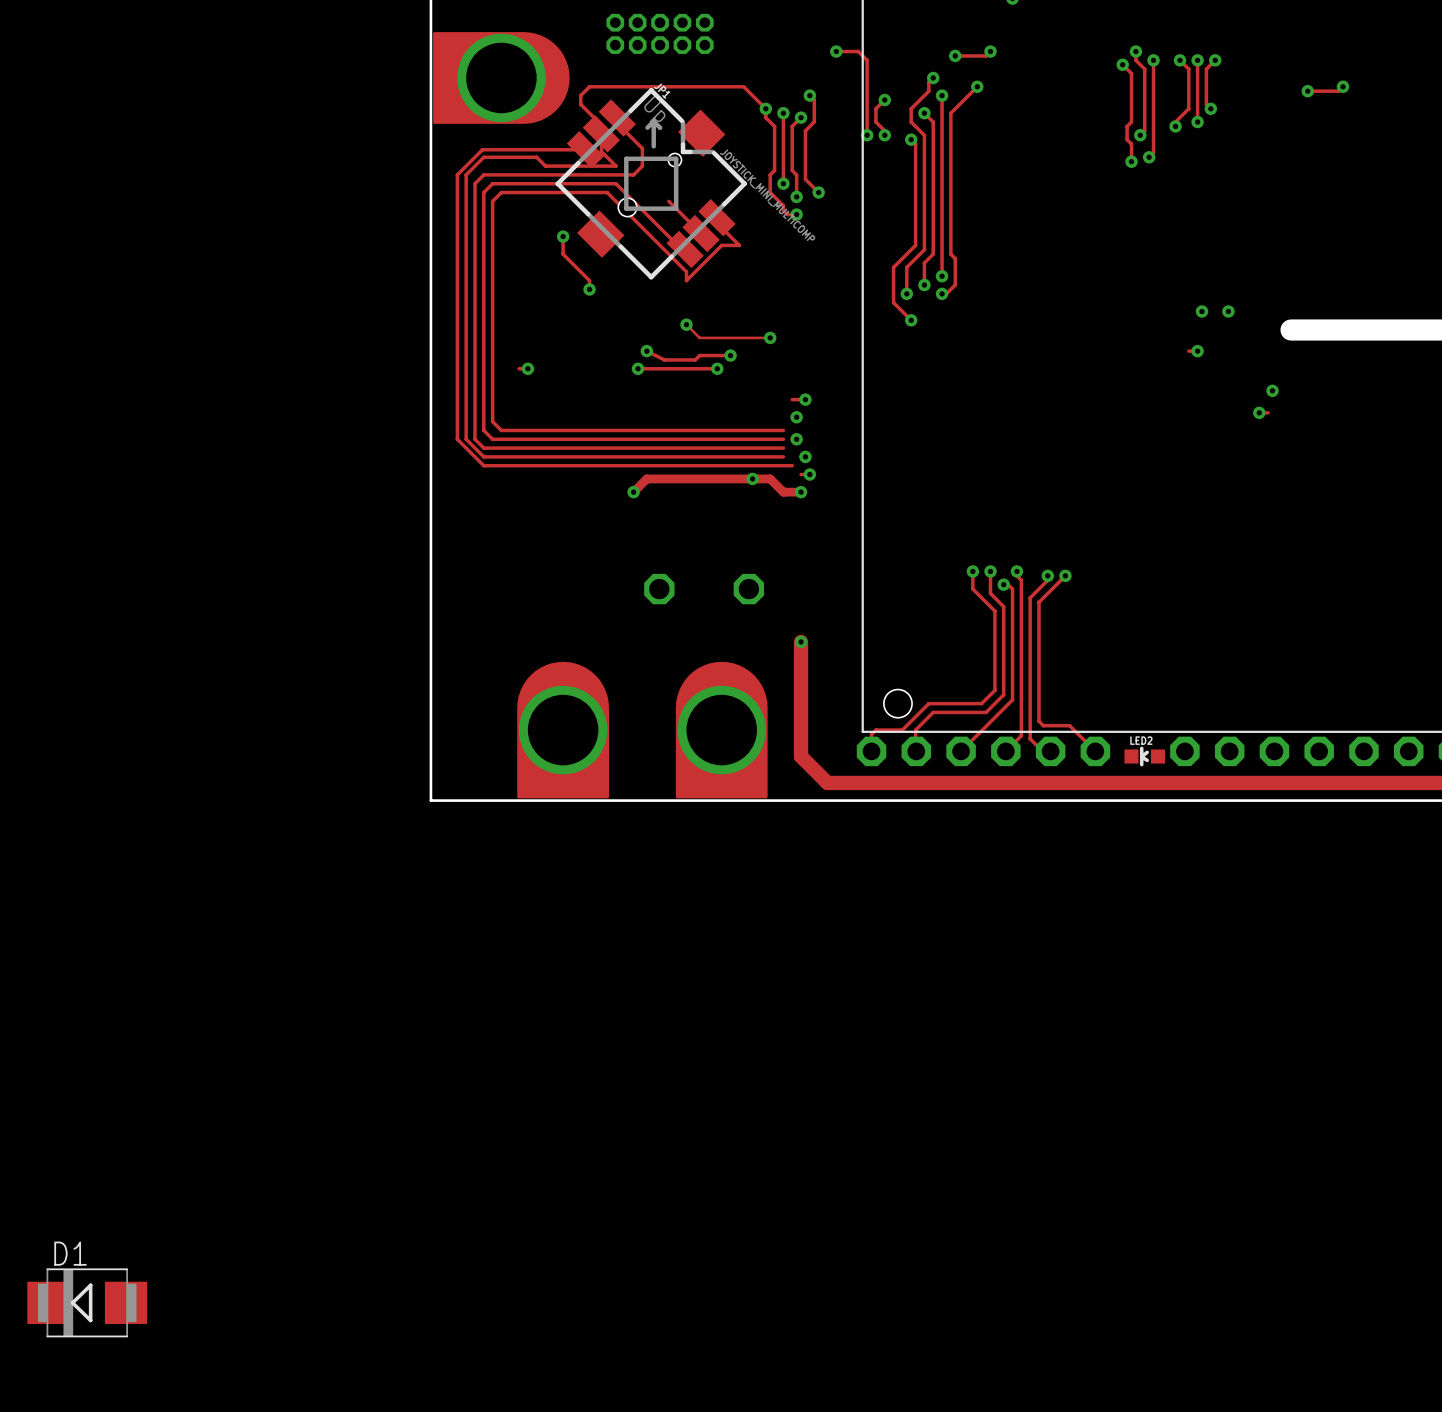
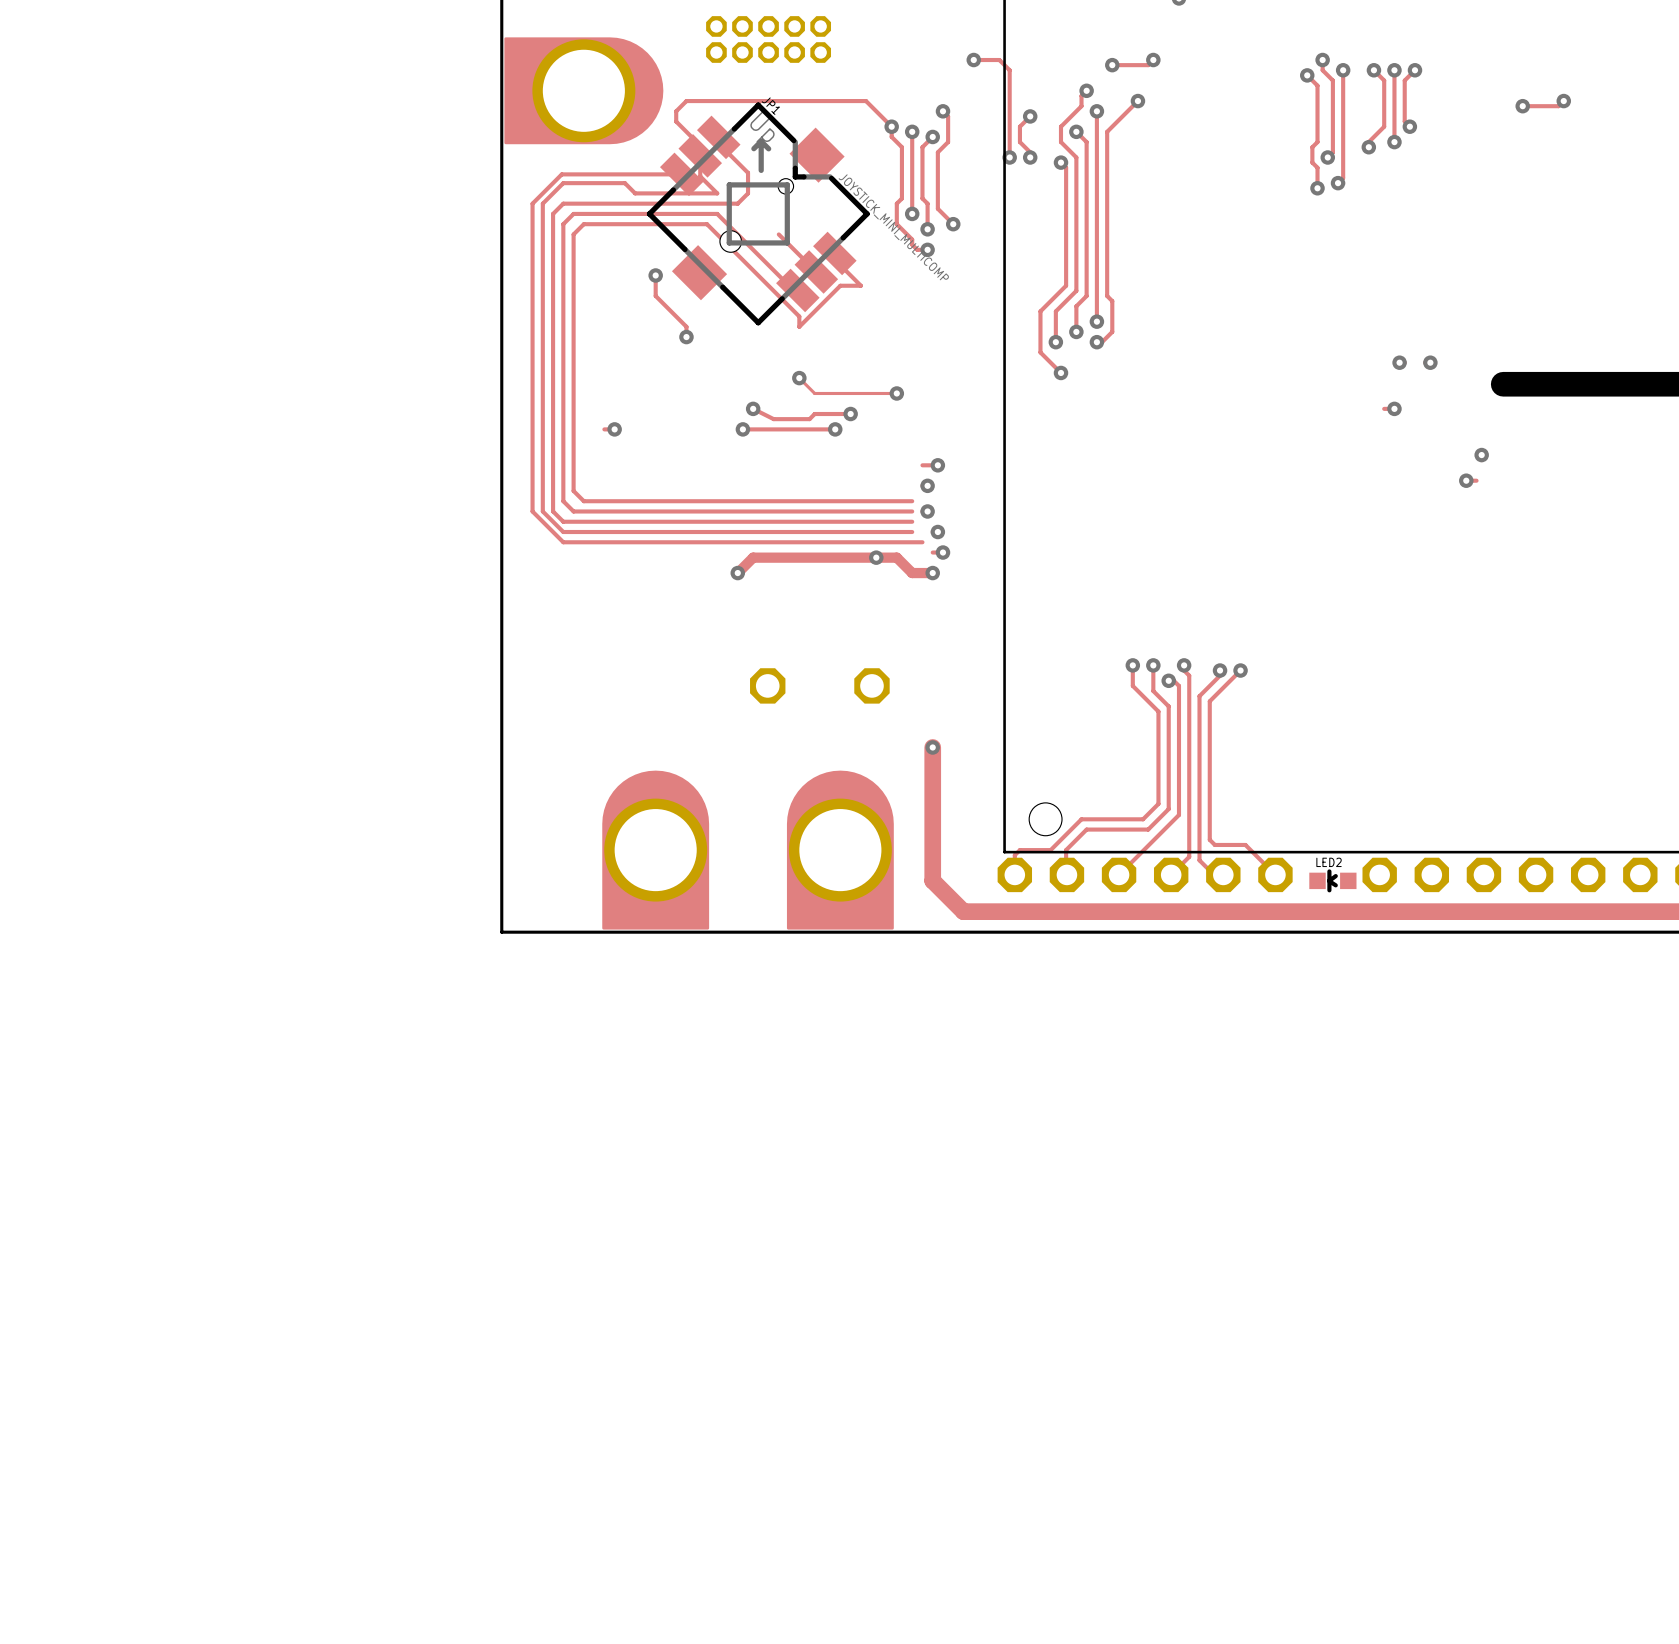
D1: (87, 1302) -> none

